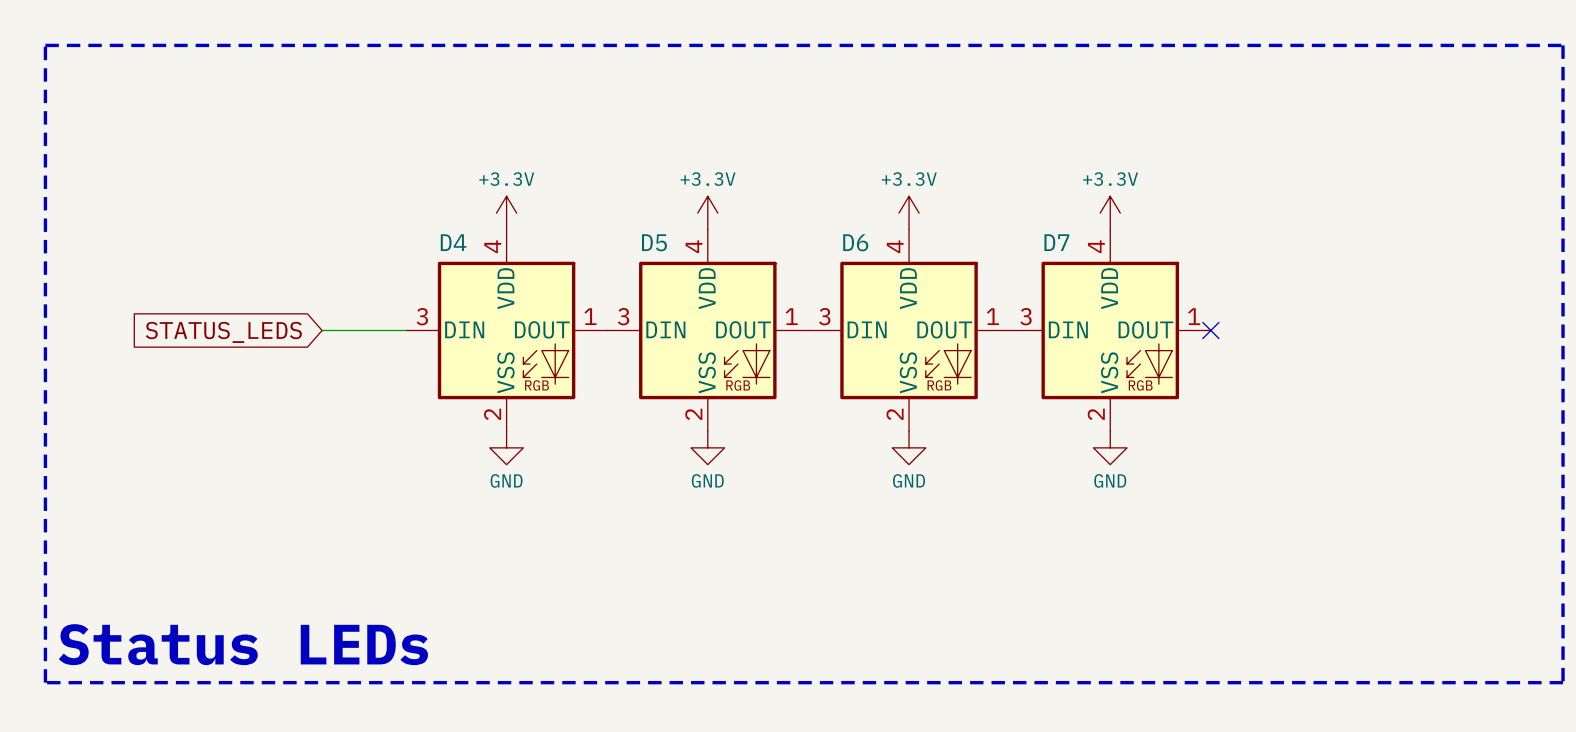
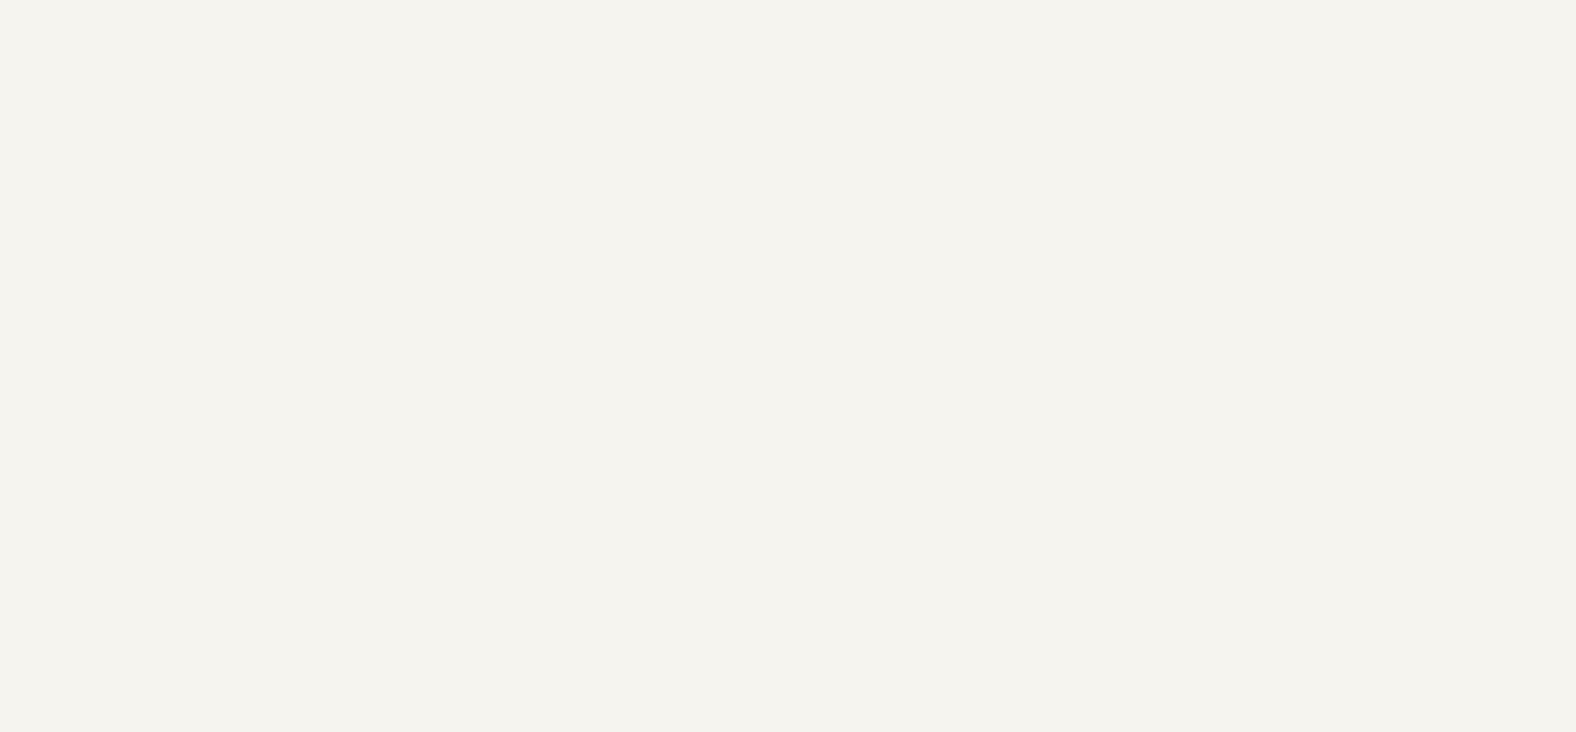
line: (45, 45) (1563, 45) (1563, 682) (45, 682) (45, 45) -> none
power symbol: +3.3V (506, 213) -> none
power symbol: +3.3V (707, 213) -> none
power symbol: +3.3V (909, 213) -> none
power symbol: +3.3V (1110, 213) -> none
wire: (322, 330) (405, 330) -> none
D4: (506, 330) -> none
D5: (707, 330) -> none
D6: (909, 330) -> none
D7: (1110, 330) -> none
no-connect mark: (1210, 330) -> none
global label: STATUS_LEDS (223, 332) -> none
power symbol: GND (506, 447) -> none
power symbol: GND (707, 447) -> none
power symbol: GND (909, 447) -> none
power symbol: GND (1110, 447) -> none
text: Status LEDs (243, 644) -> none

